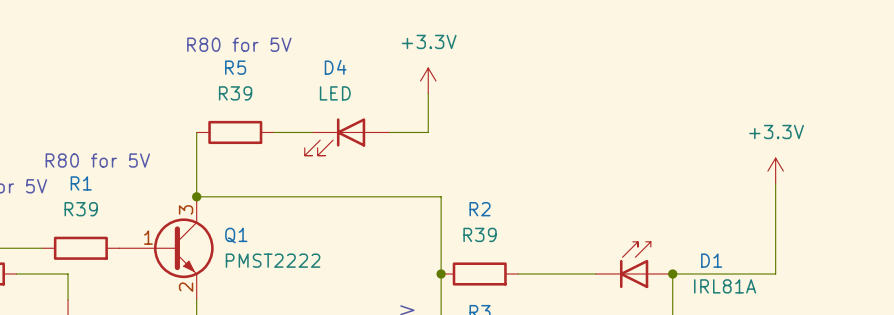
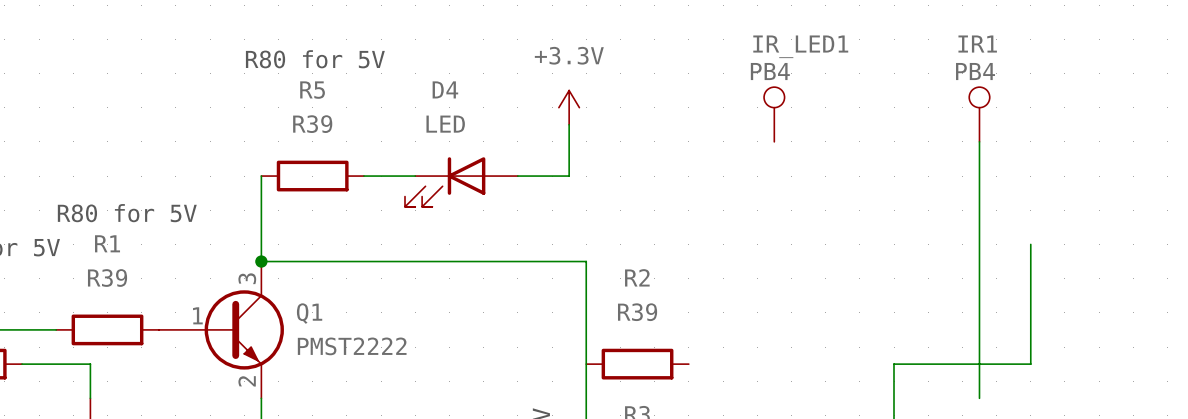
IR_LED1: none -> PB4 (774, 114)
IR1: none -> PB4 (979, 114)
wire: none -> (979, 141) (979, 398)
power symbol: +3.3V (775, 171) -> none
D1: IRL81A (634, 264) -> none
junction: (441, 273) -> none
wire: (518, 273) (595, 273) -> none
junction: (672, 273) -> none

